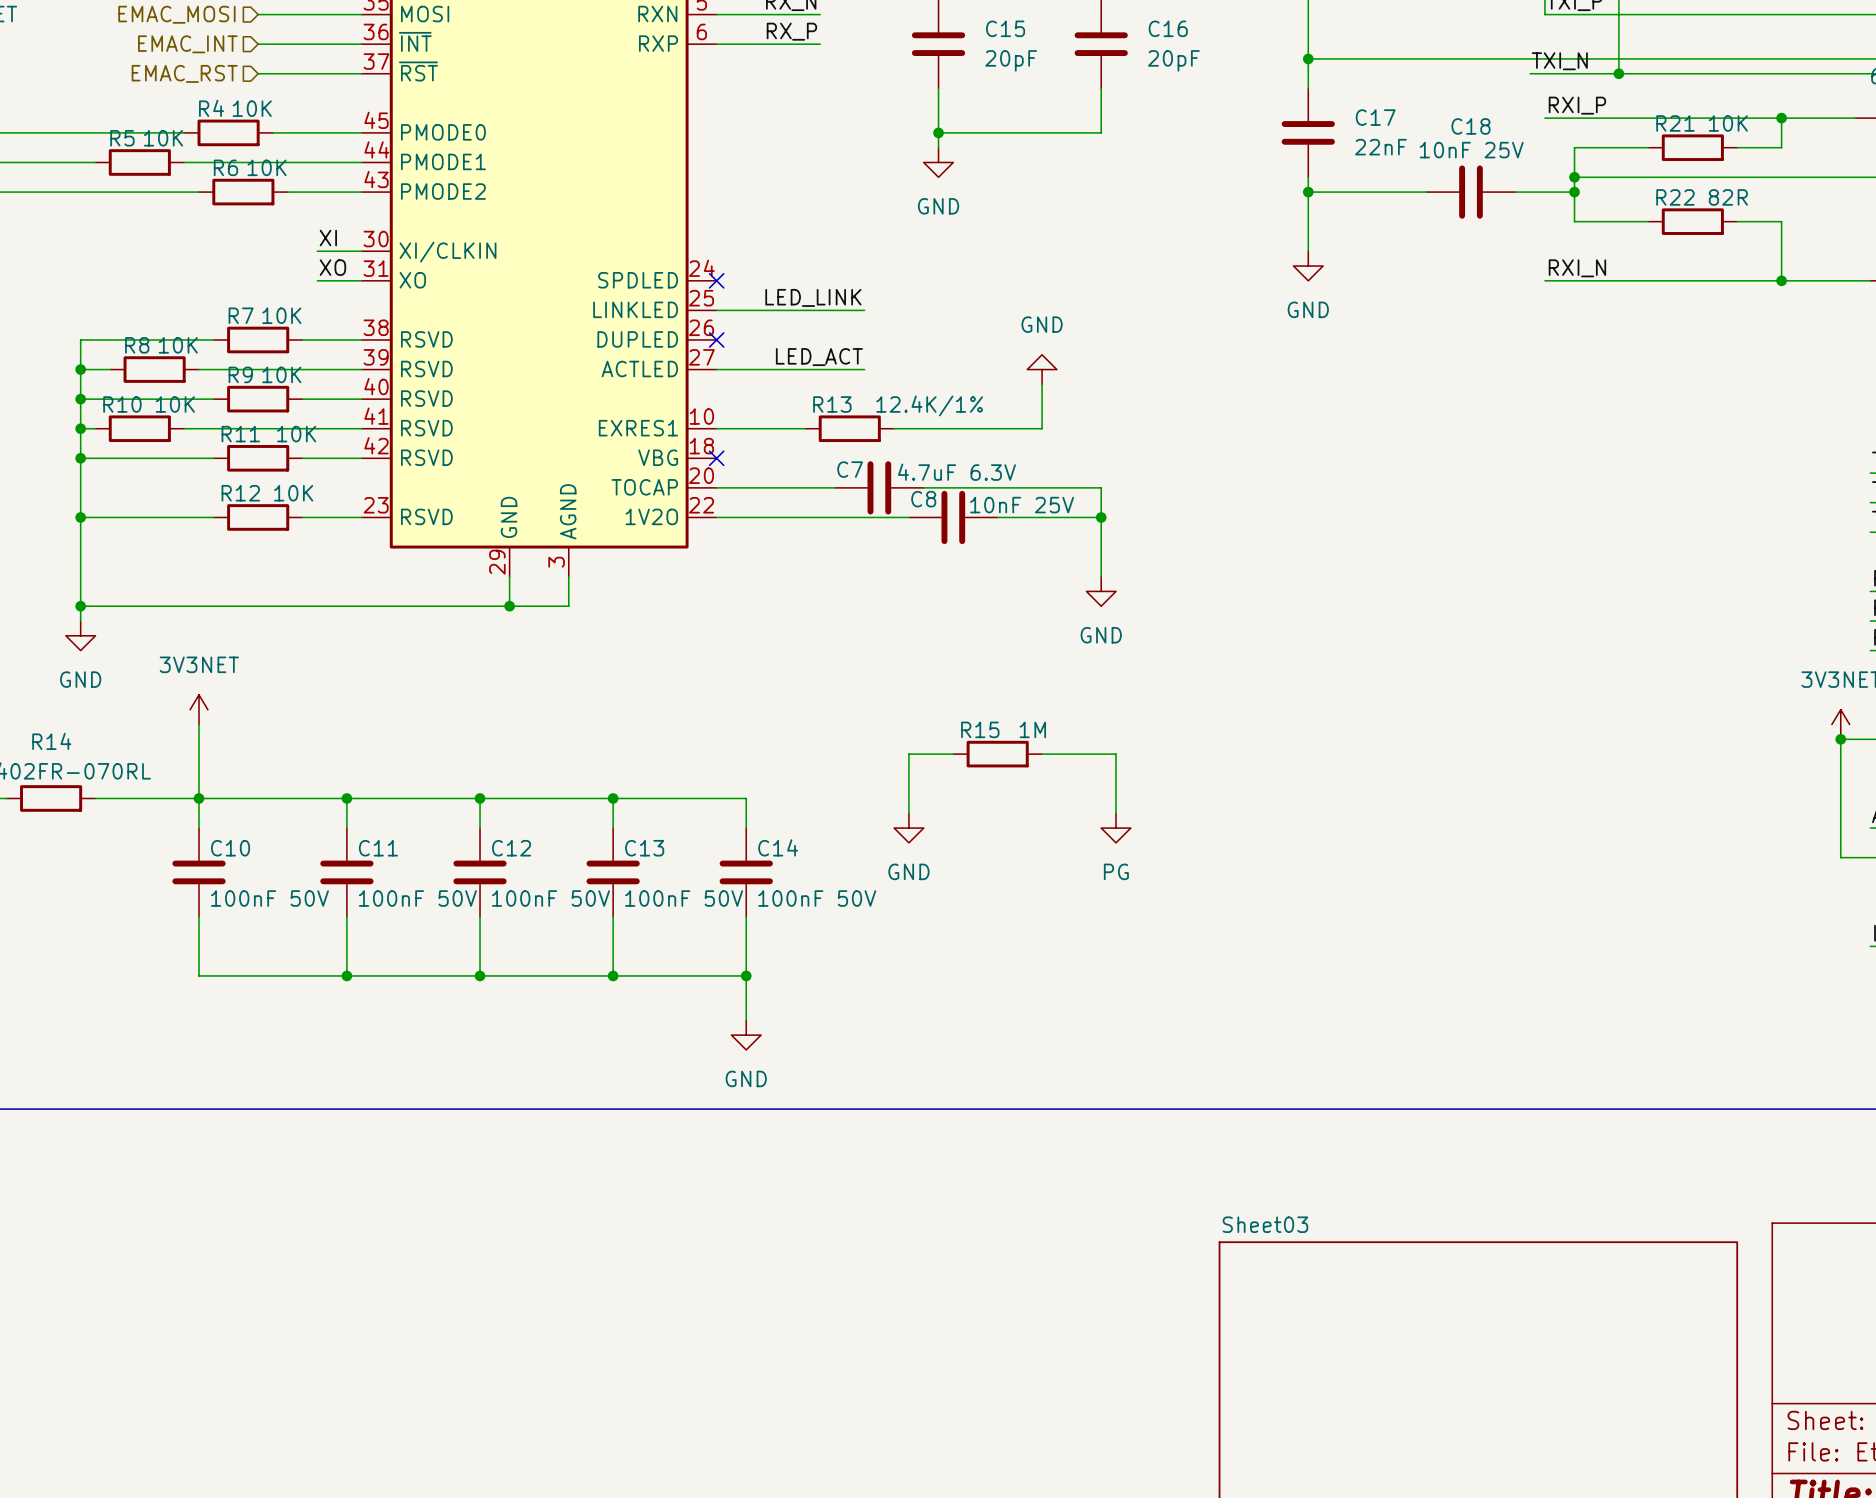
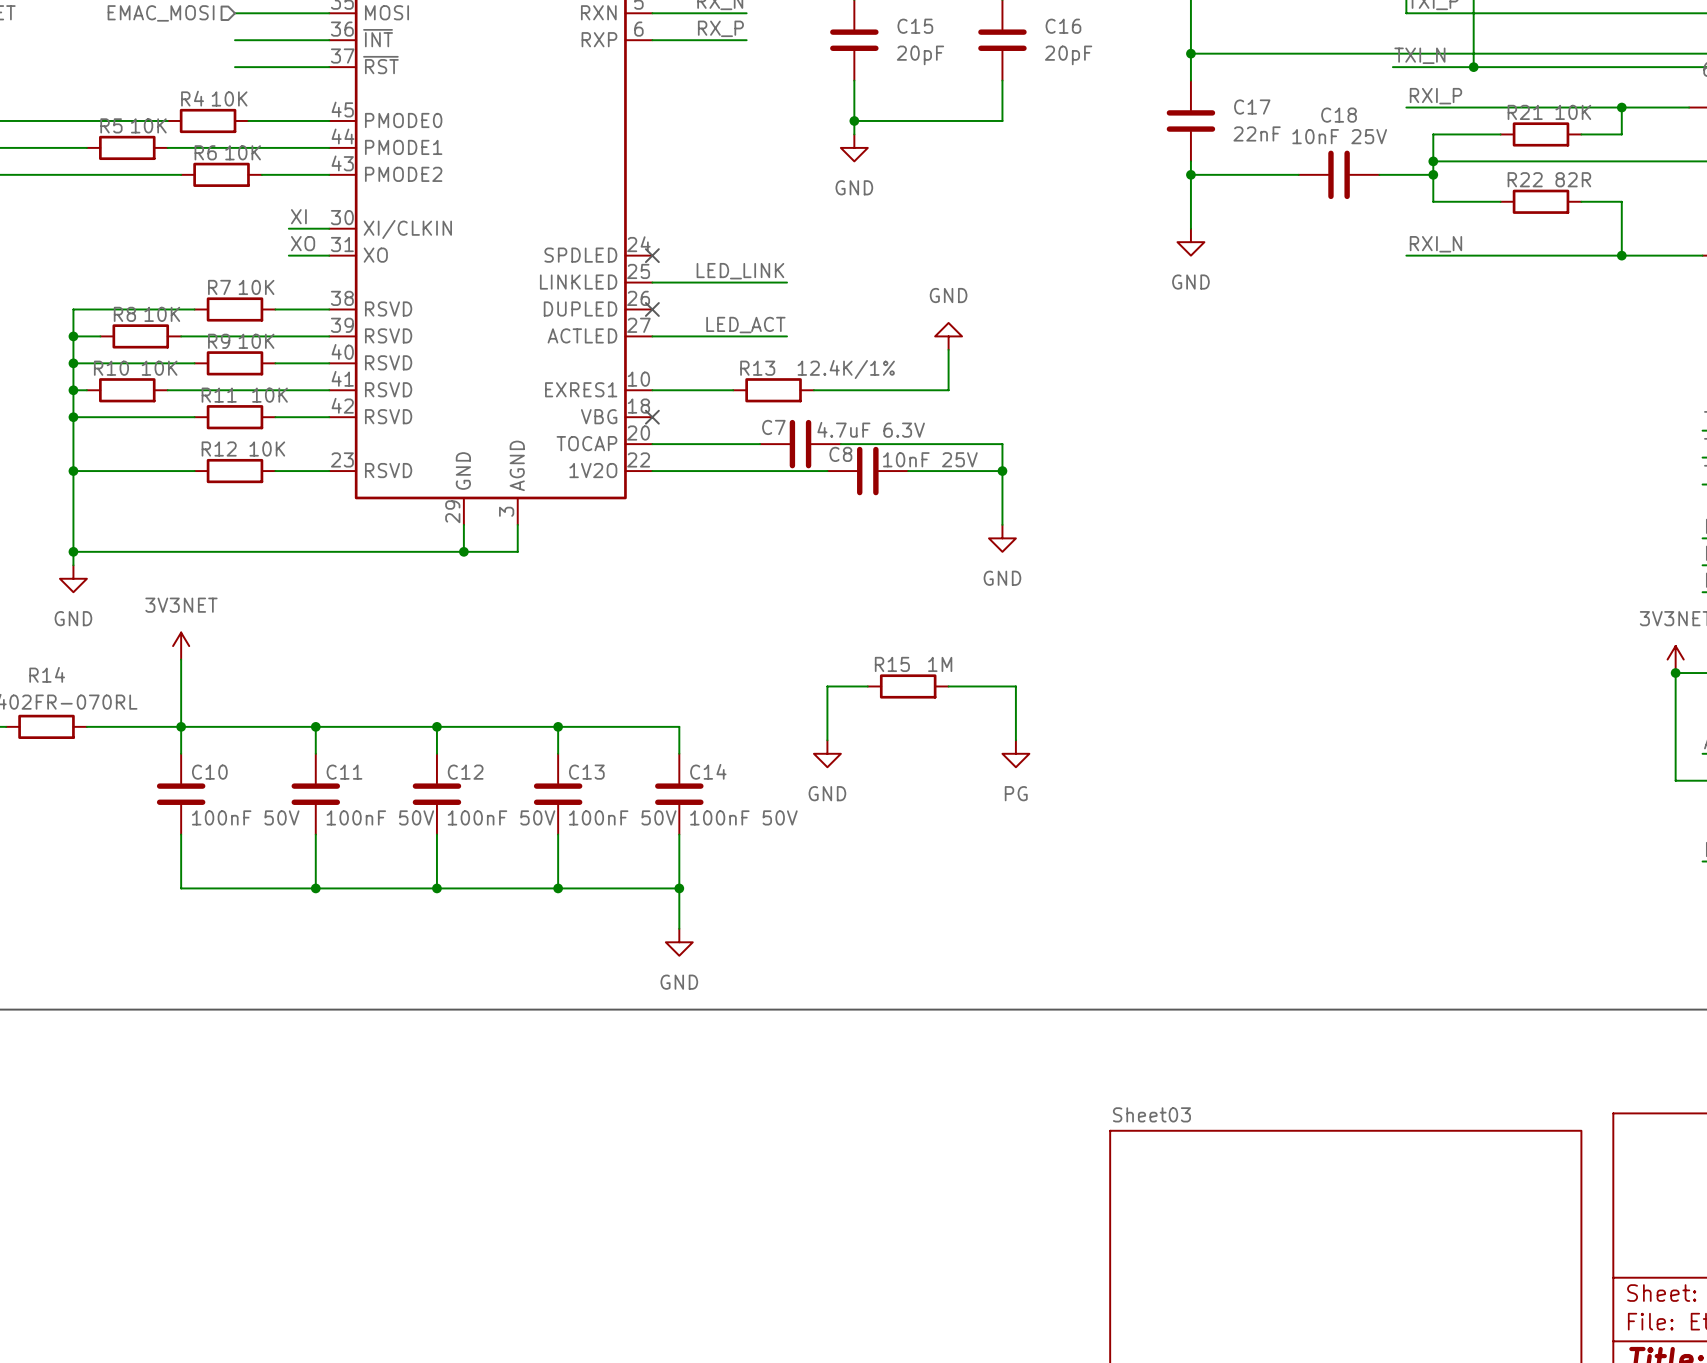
hierarchical label: EMAC_INT (187, 44) -> none
hierarchical label: EMAC_RST (184, 73) -> none

